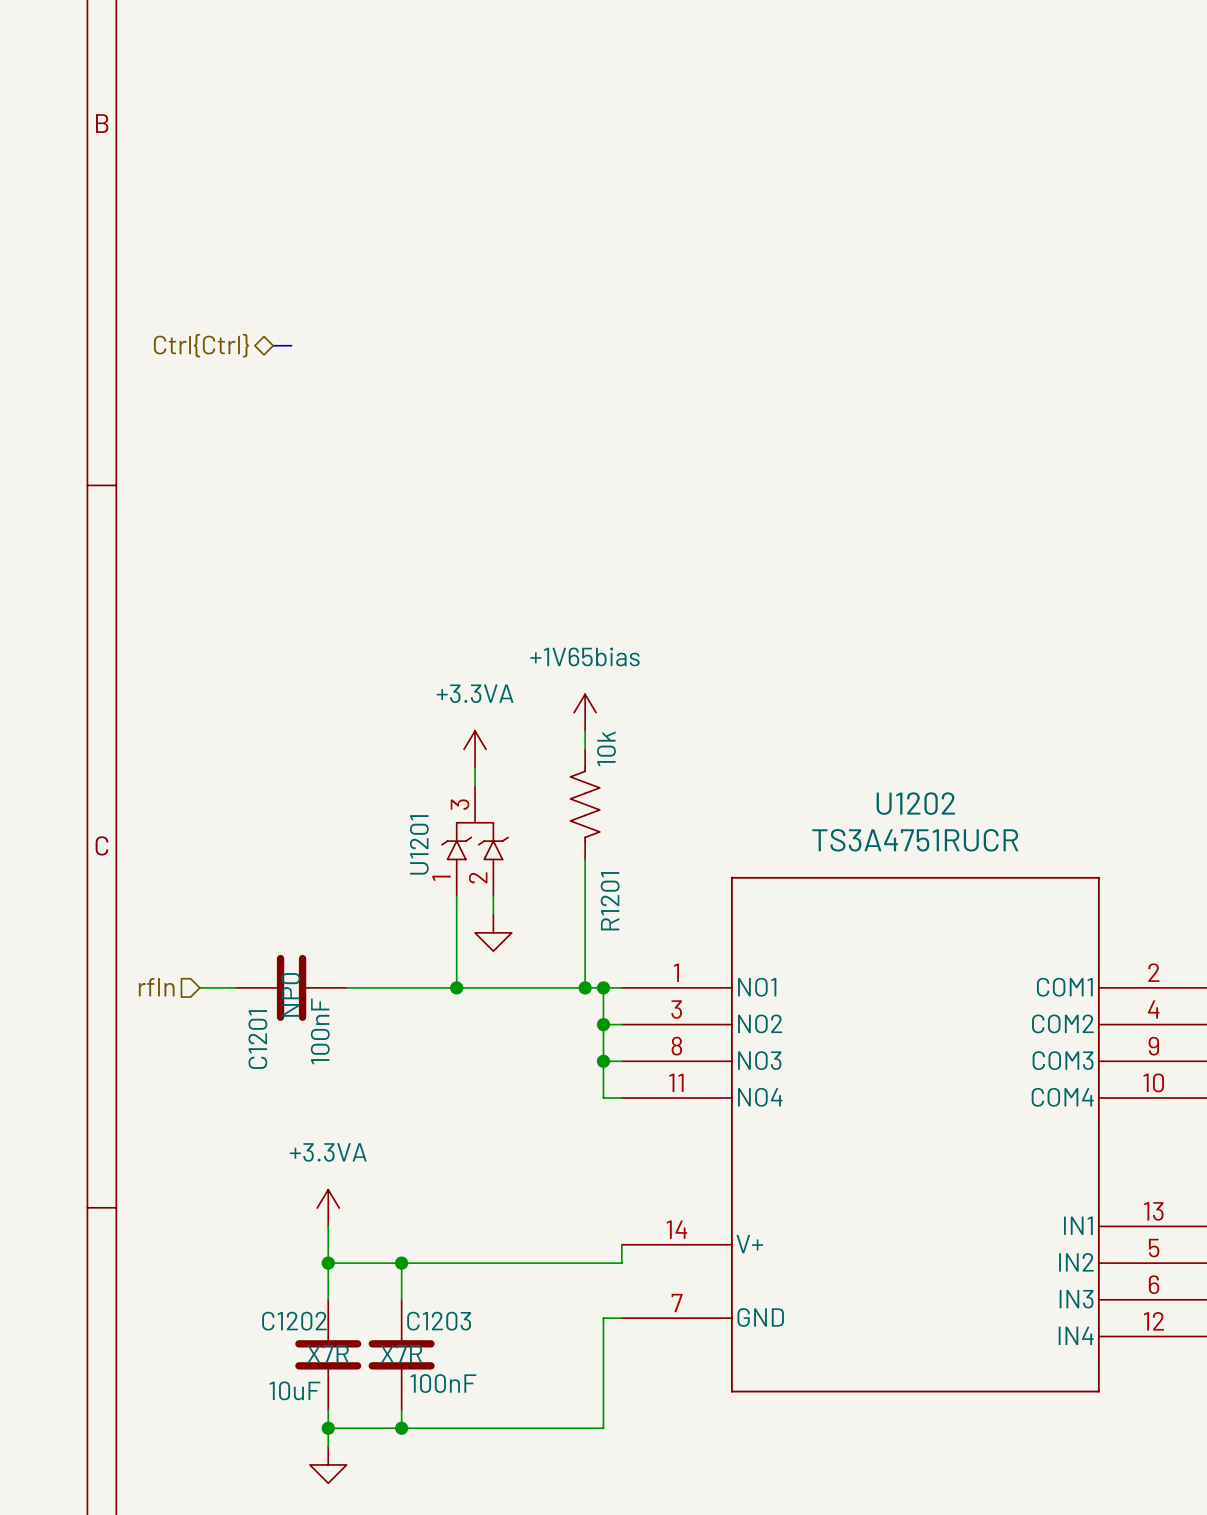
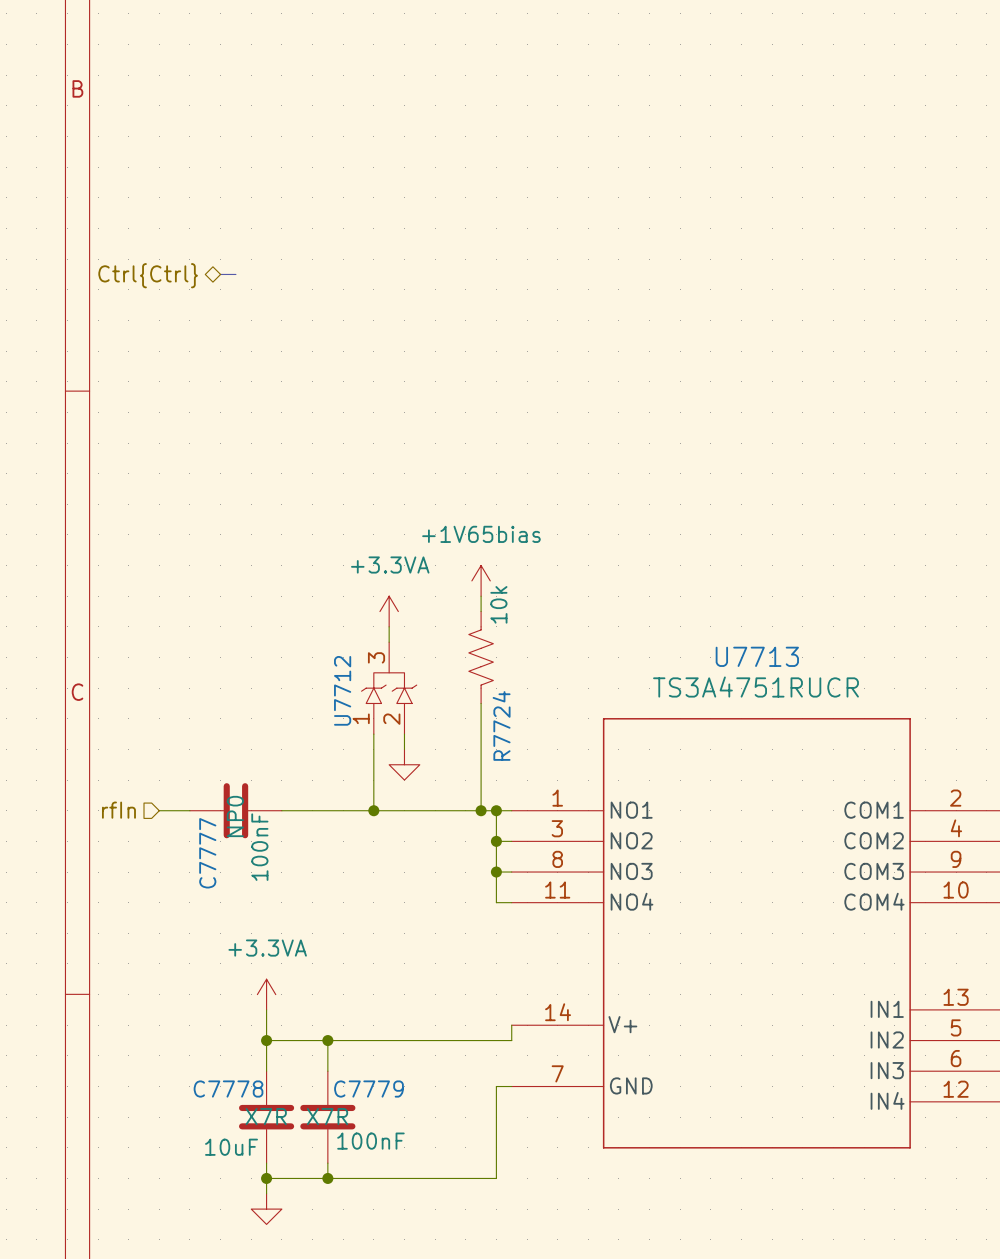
U1202 name: U1202 (915, 803) -> U7713 (757, 656)
U1201 name: U1201 (419, 844) -> U7712 (342, 690)
R1201 name: R1201 (610, 901) -> R7724 (501, 725)
C1201 name: C1201 (257, 1039) -> C7777 (207, 853)
C1202 name: C1202 (294, 1321) -> C7778 (228, 1089)
C1203 name: C1203 (439, 1321) -> C7779 (368, 1089)

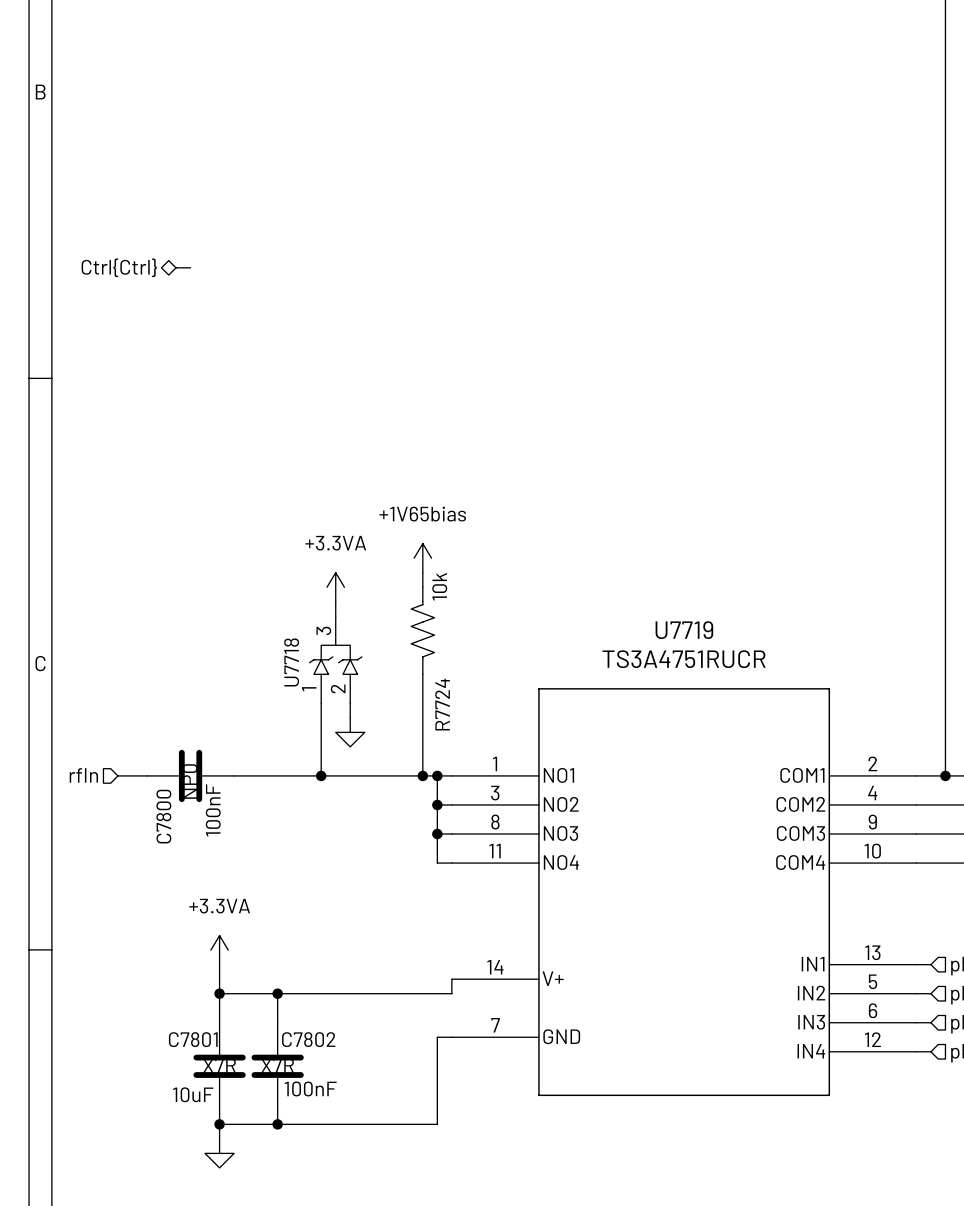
U7713 name: U7713 (757, 656) -> U7719 (684, 630)
U7712 name: U7712 (342, 690) -> U7718 (291, 662)
C7777 name: C7777 (207, 853) -> C7800 (163, 816)
C7778 name: C7778 (228, 1089) -> C7801 (193, 1039)
C7779 name: C7779 (368, 1089) -> C7802 (308, 1039)

